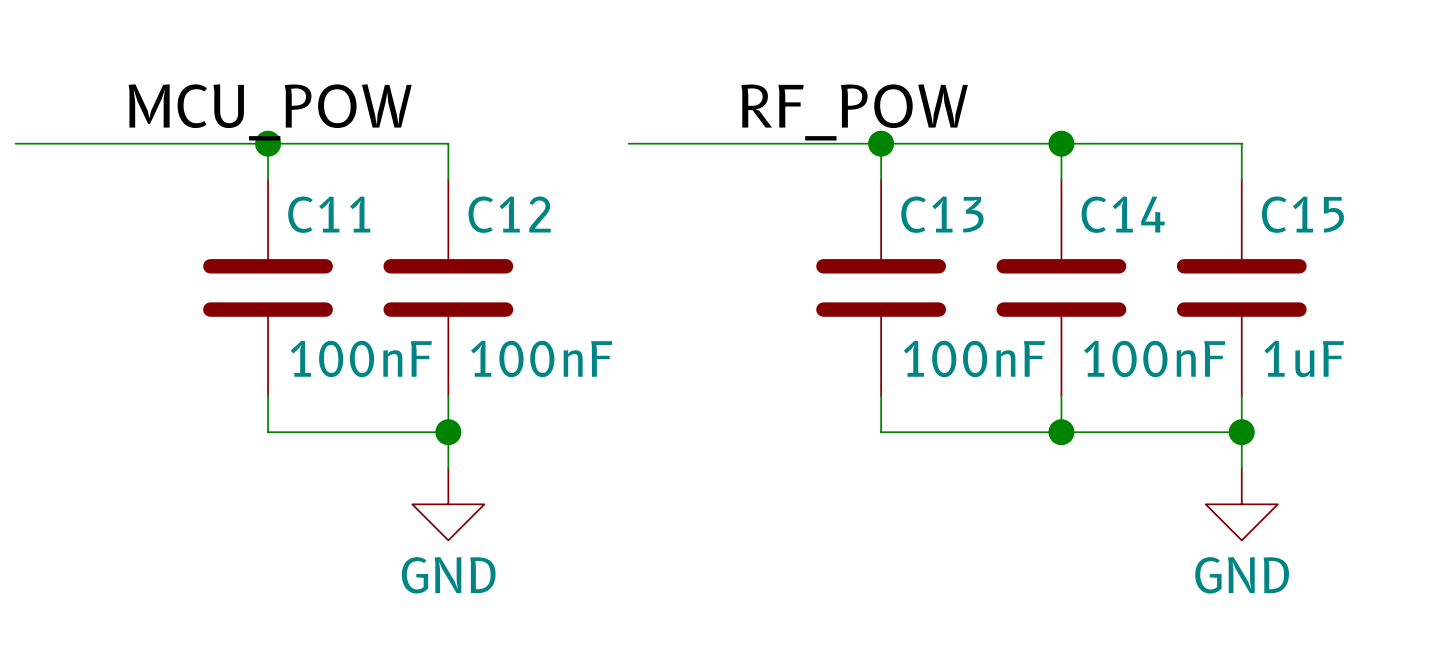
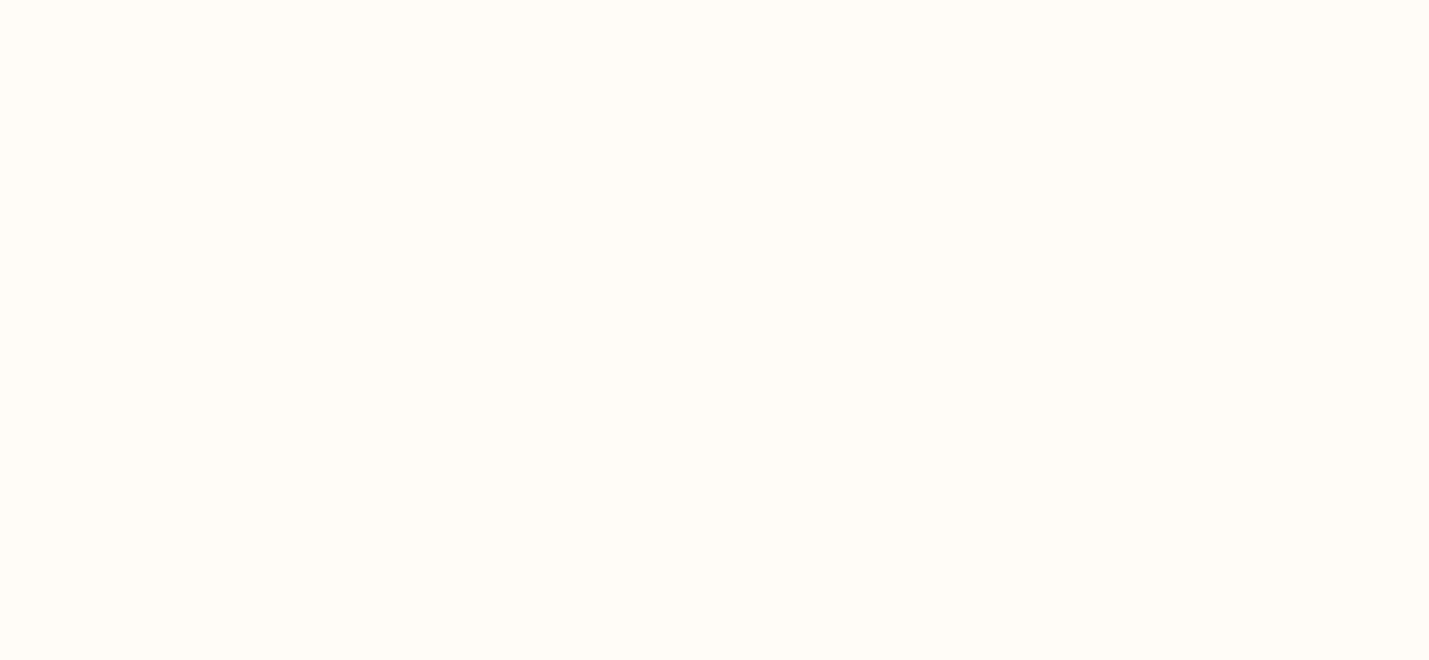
label: MCU_POW (270, 112) -> none
label: RF_POW (854, 112) -> none
wire: (15, 143) (448, 143) (448, 179) -> none
wire: (268, 143) (268, 179) -> none
junction: (268, 143) -> none
wire: (628, 143) (1241, 143) (1241, 179) -> none
wire: (881, 143) (881, 179) -> none
junction: (881, 143) -> none
wire: (1061, 143) (1061, 179) -> none
junction: (1061, 143) -> none
C11: 100nF (268, 287) -> none
C12: 100nF (448, 287) -> none
C13: 100nF (881, 287) -> none
C14: 100nF (1061, 287) -> none
C15: 1uF (1241, 287) -> none
wire: (268, 396) (268, 432) (448, 432) -> none
wire: (448, 396) (448, 468) -> none
wire: (881, 396) (881, 432) (1241, 432) -> none
wire: (1061, 396) (1061, 432) -> none
wire: (1241, 396) (1241, 468) -> none
junction: (448, 432) -> none
junction: (1061, 432) -> none
junction: (1241, 432) -> none
power symbol: GND (448, 504) -> none
power symbol: GND (1241, 504) -> none

